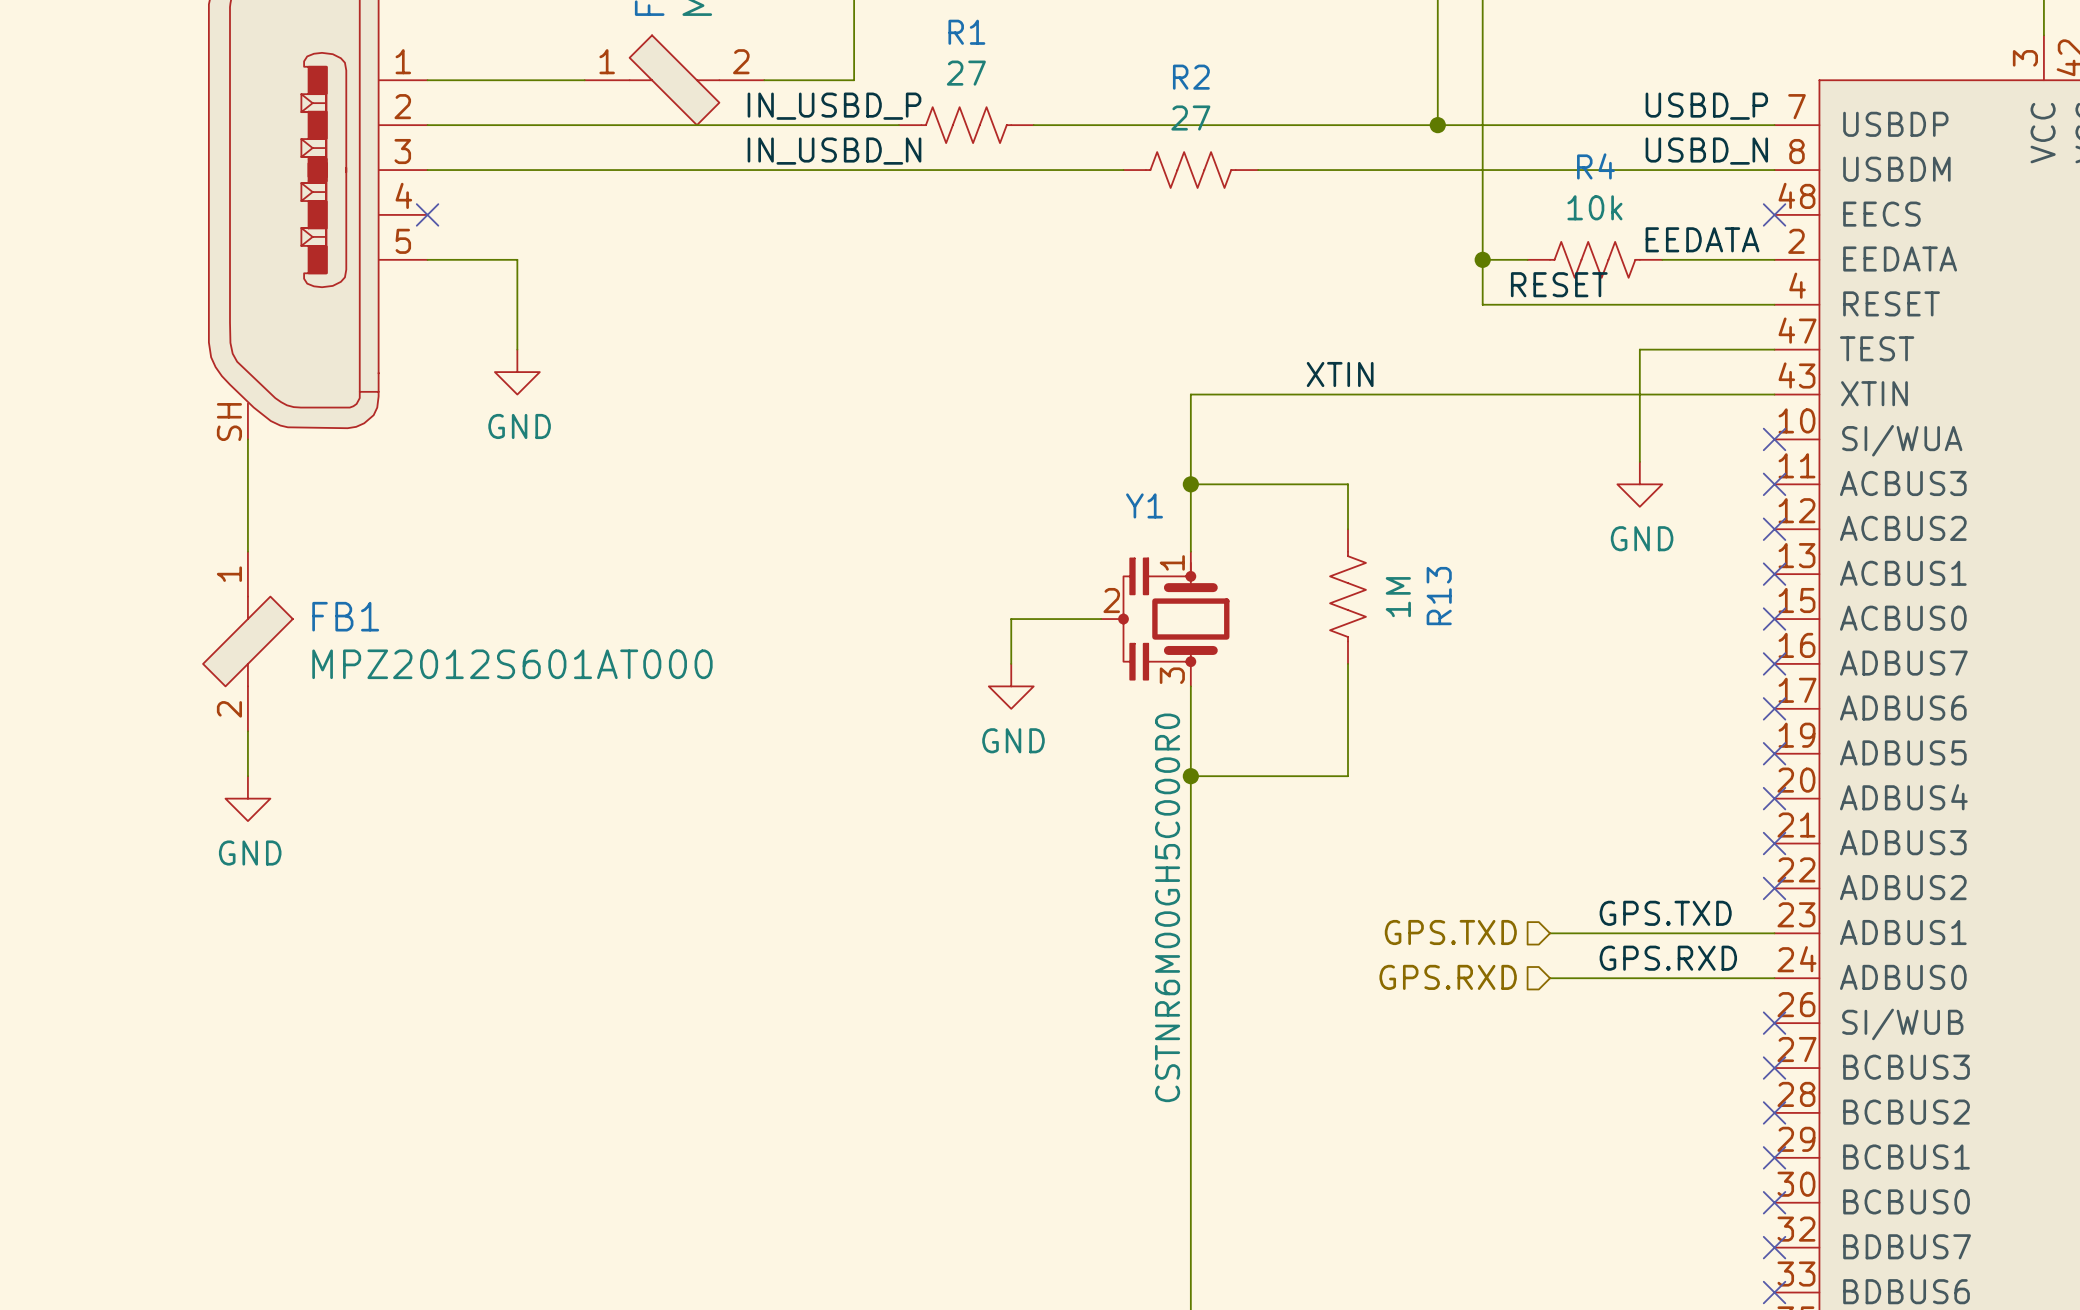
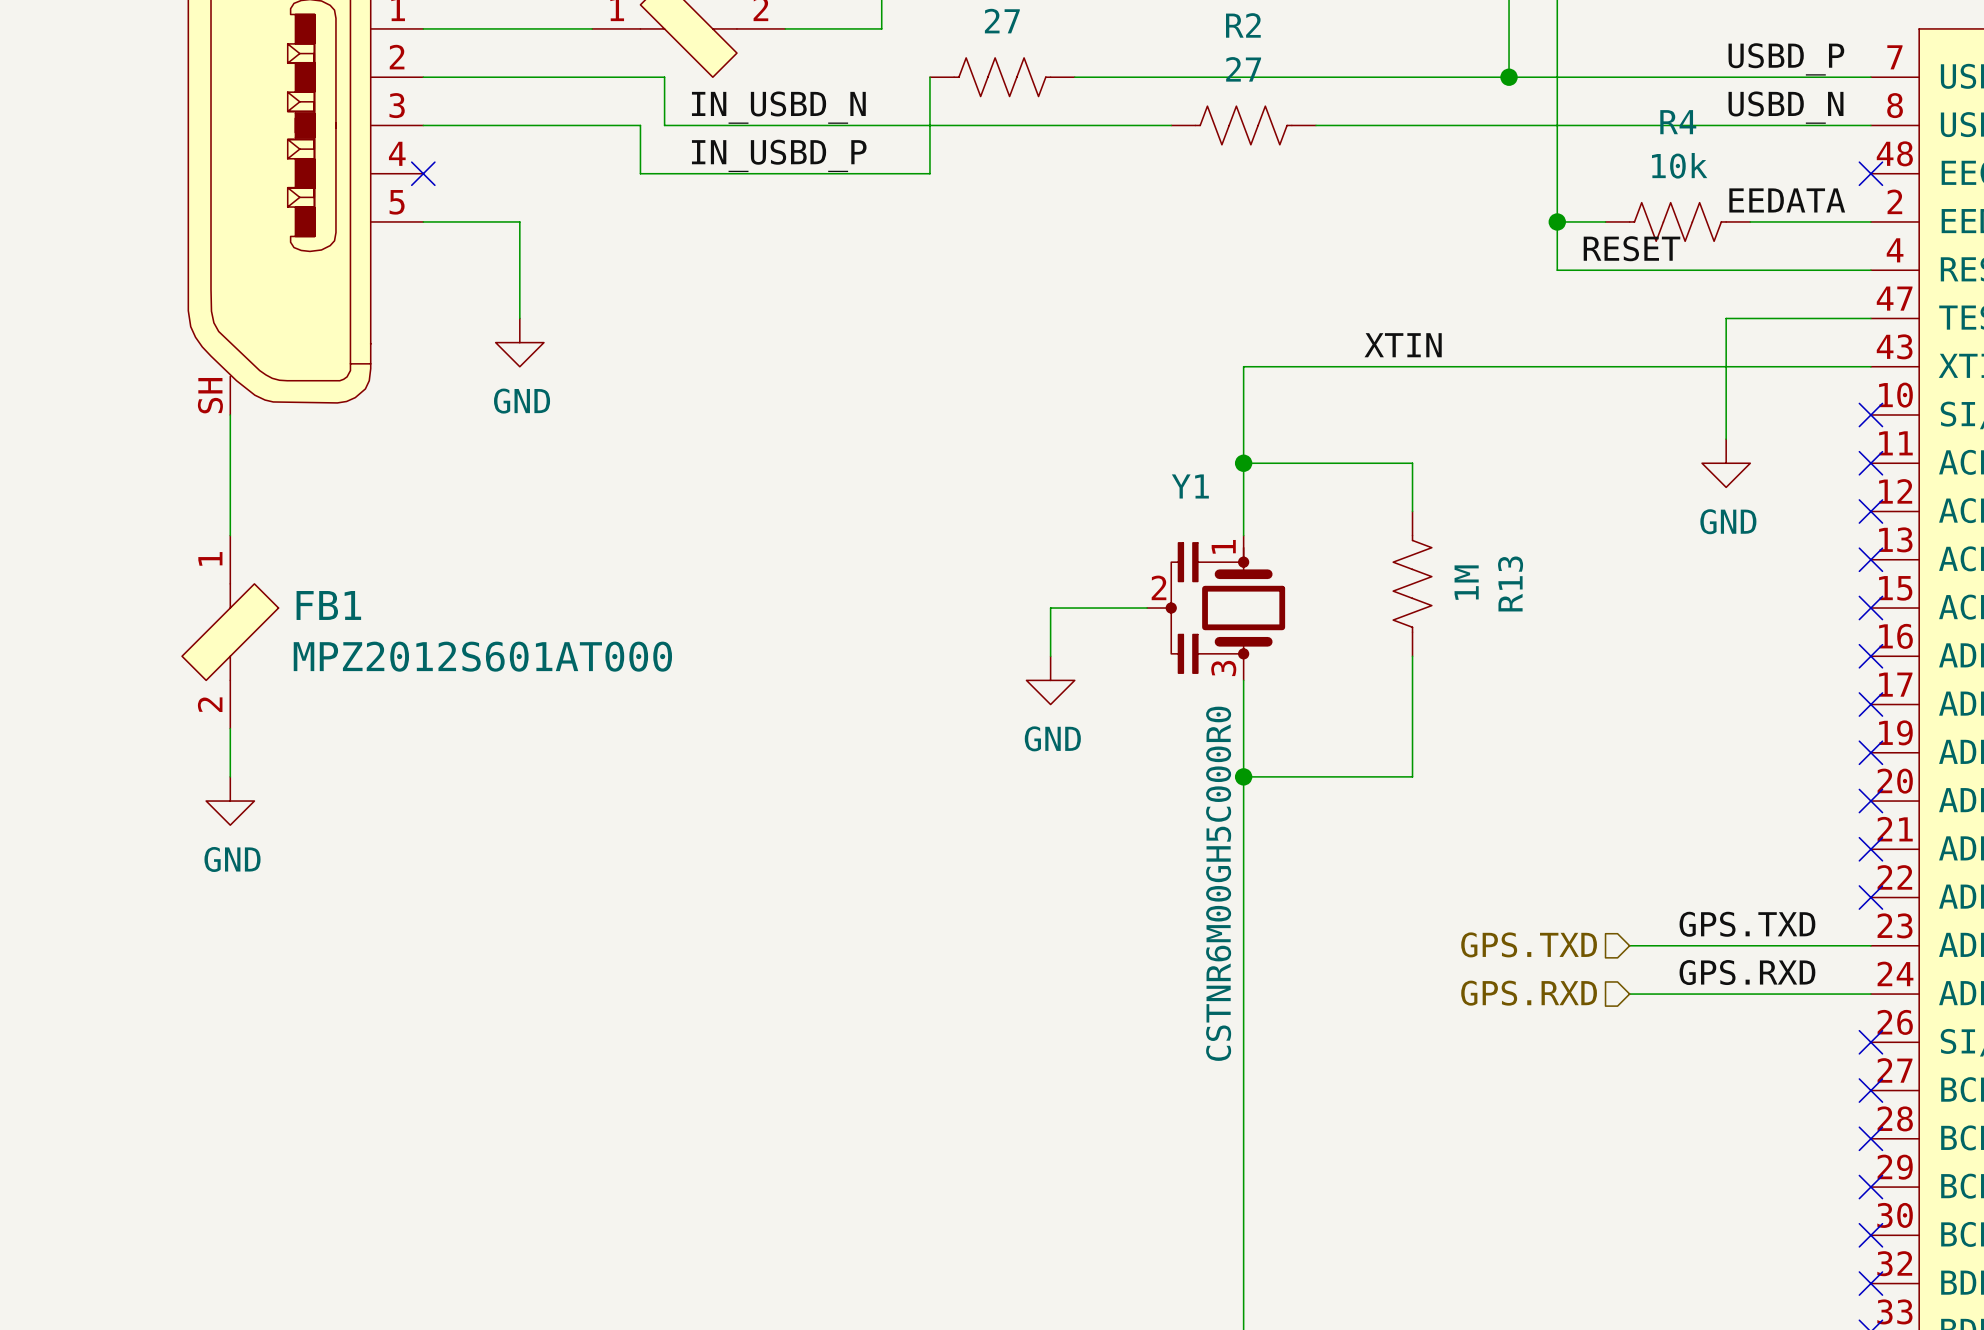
label position: IN_USBD_P (834, 106) -> IN_USBD_P (779, 155)
wire: (652, 125) (899, 125) -> (640, 125) (640, 173) (929, 173) (929, 77)
label position: IN_USBD_N (834, 151) -> IN_USBD_N (778, 107)
wire: (629, 170) (652, 170) -> (664, 77) (664, 125)

